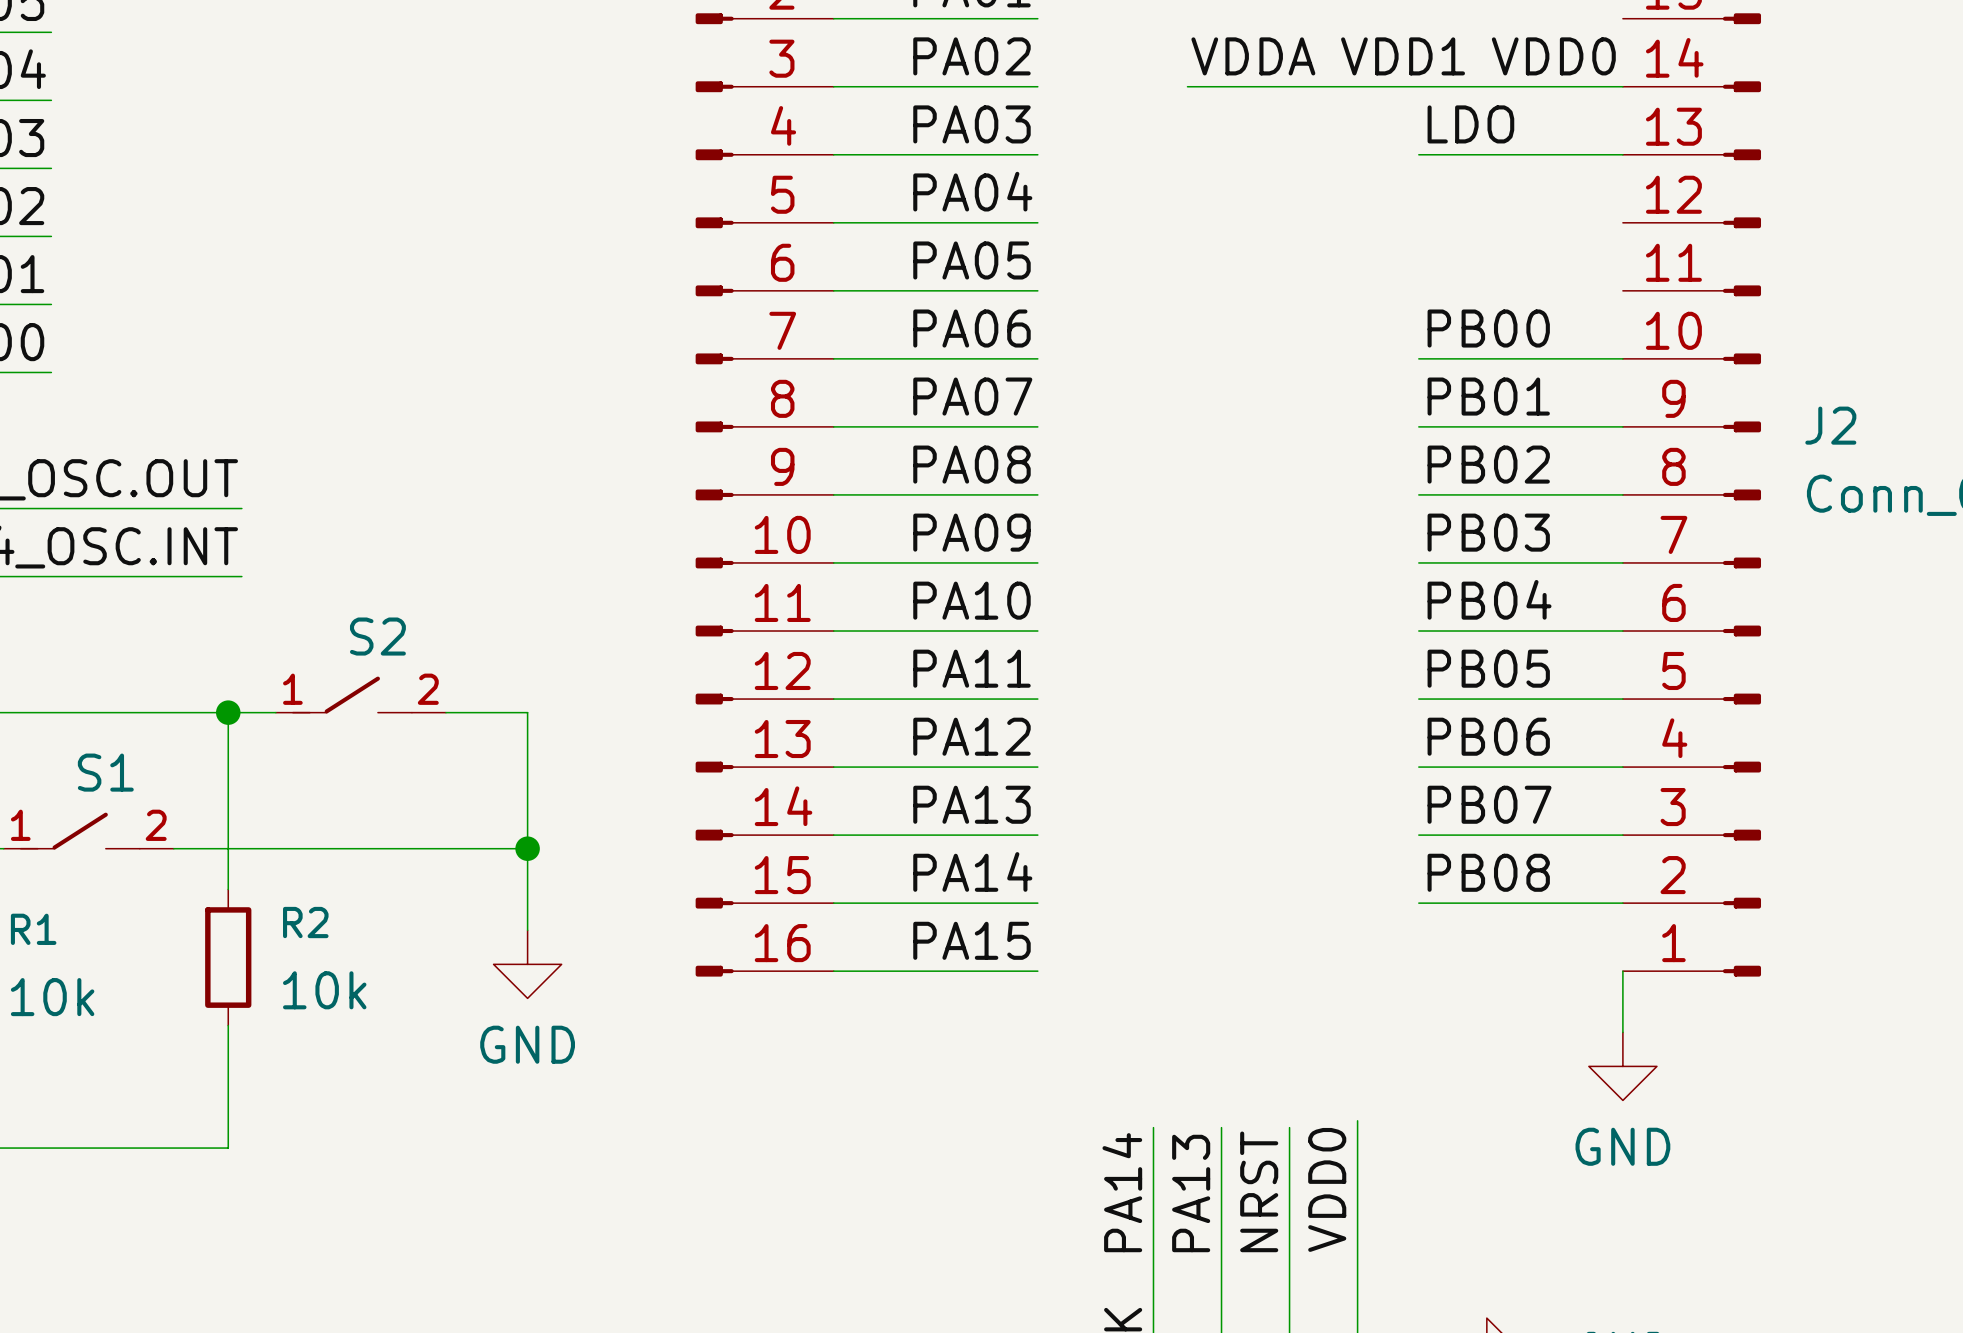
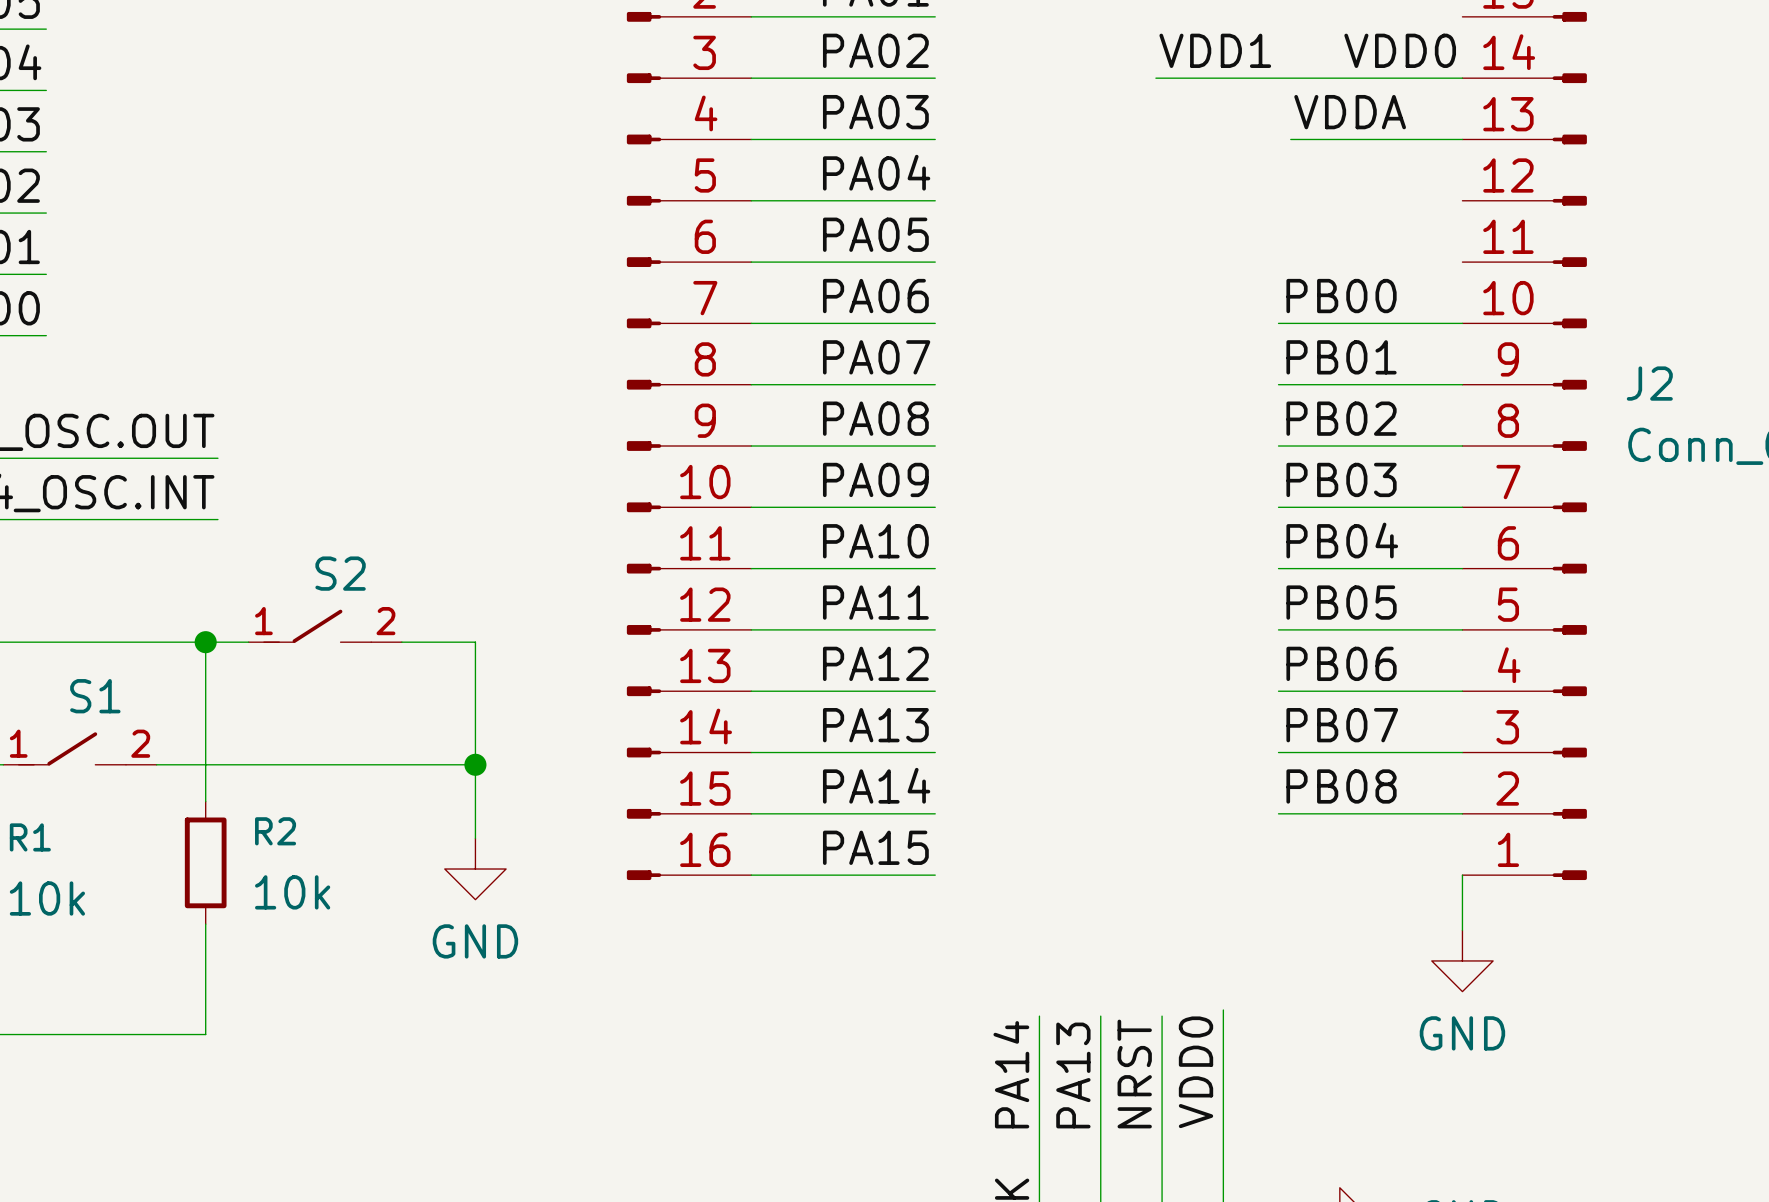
label: VDDA (1253, 56) -> none
label position: VDD1 (1403, 56) -> VDD1 (1215, 50)
wire: (1187, 86) (1282, 86) -> none
label: LDO (1470, 124) -> VDDA (1350, 112)
wire: (1418, 154) (1432, 154) -> none

